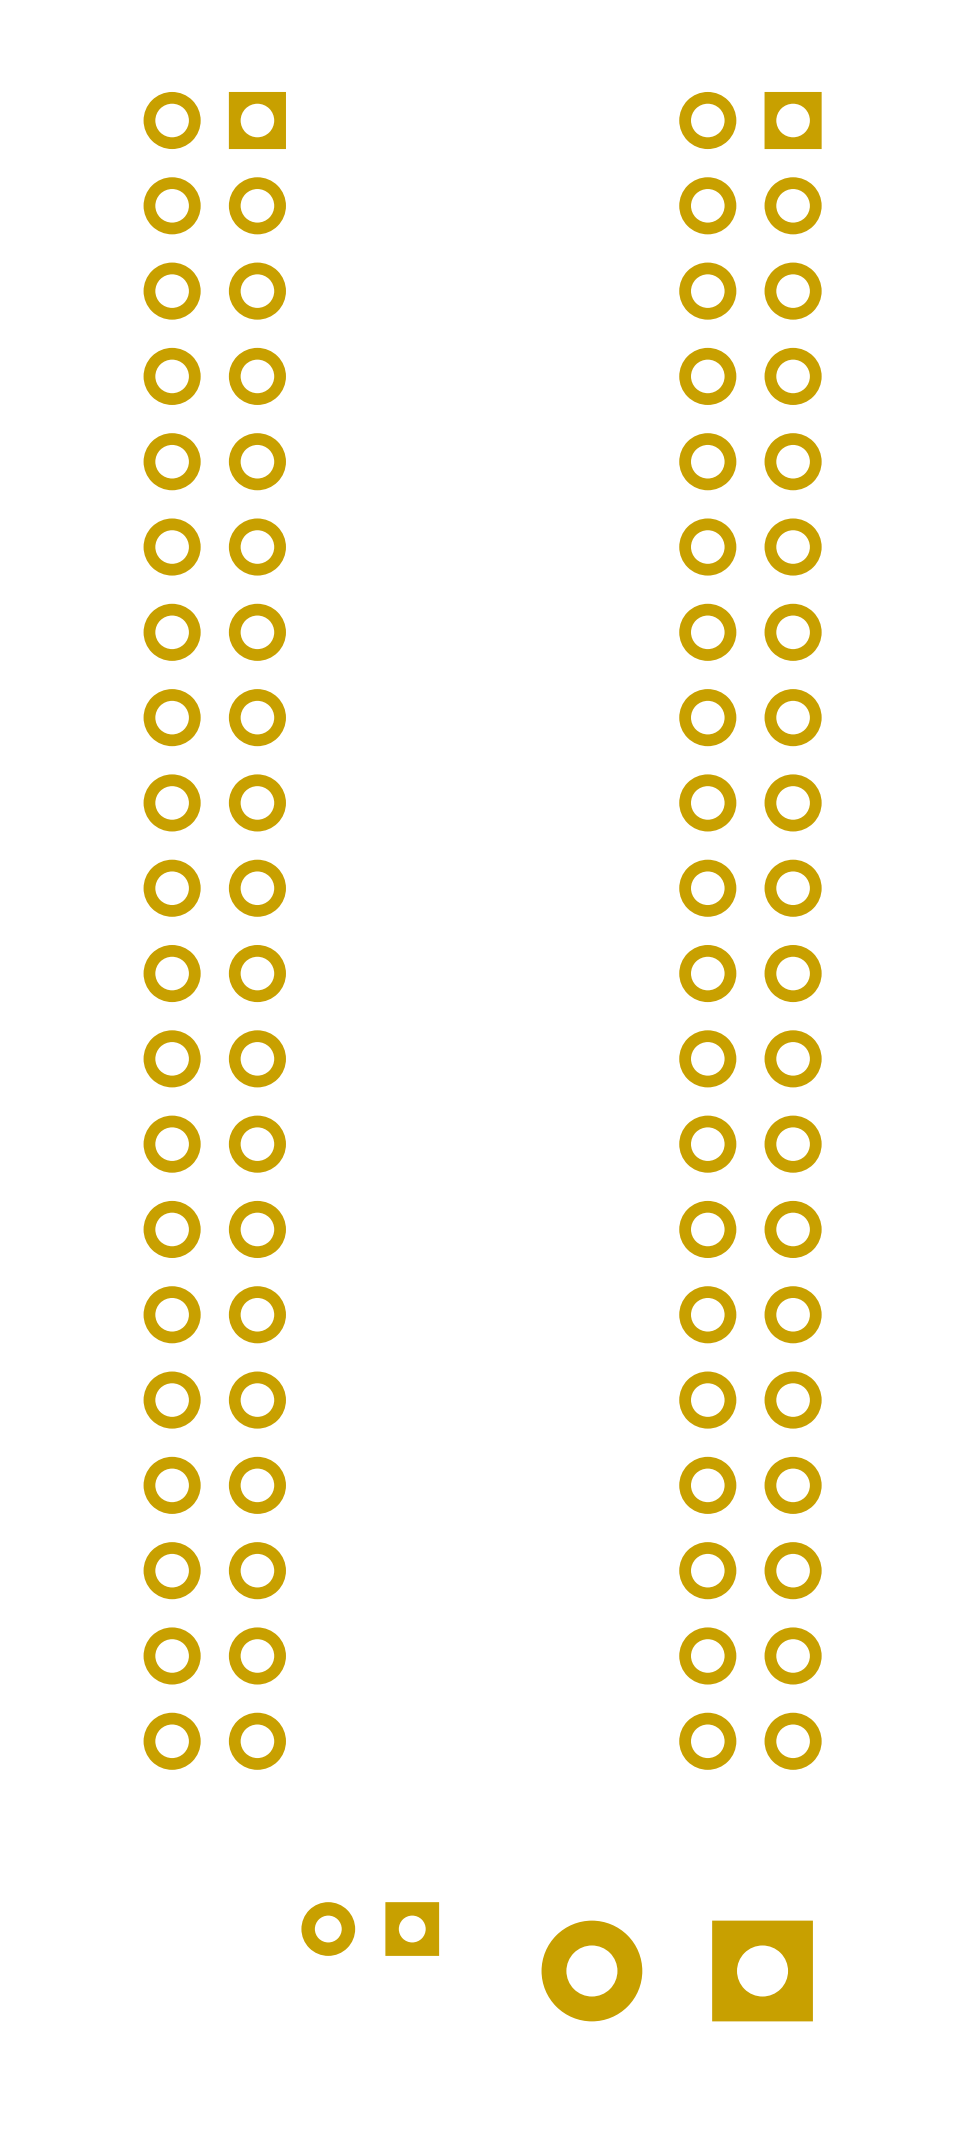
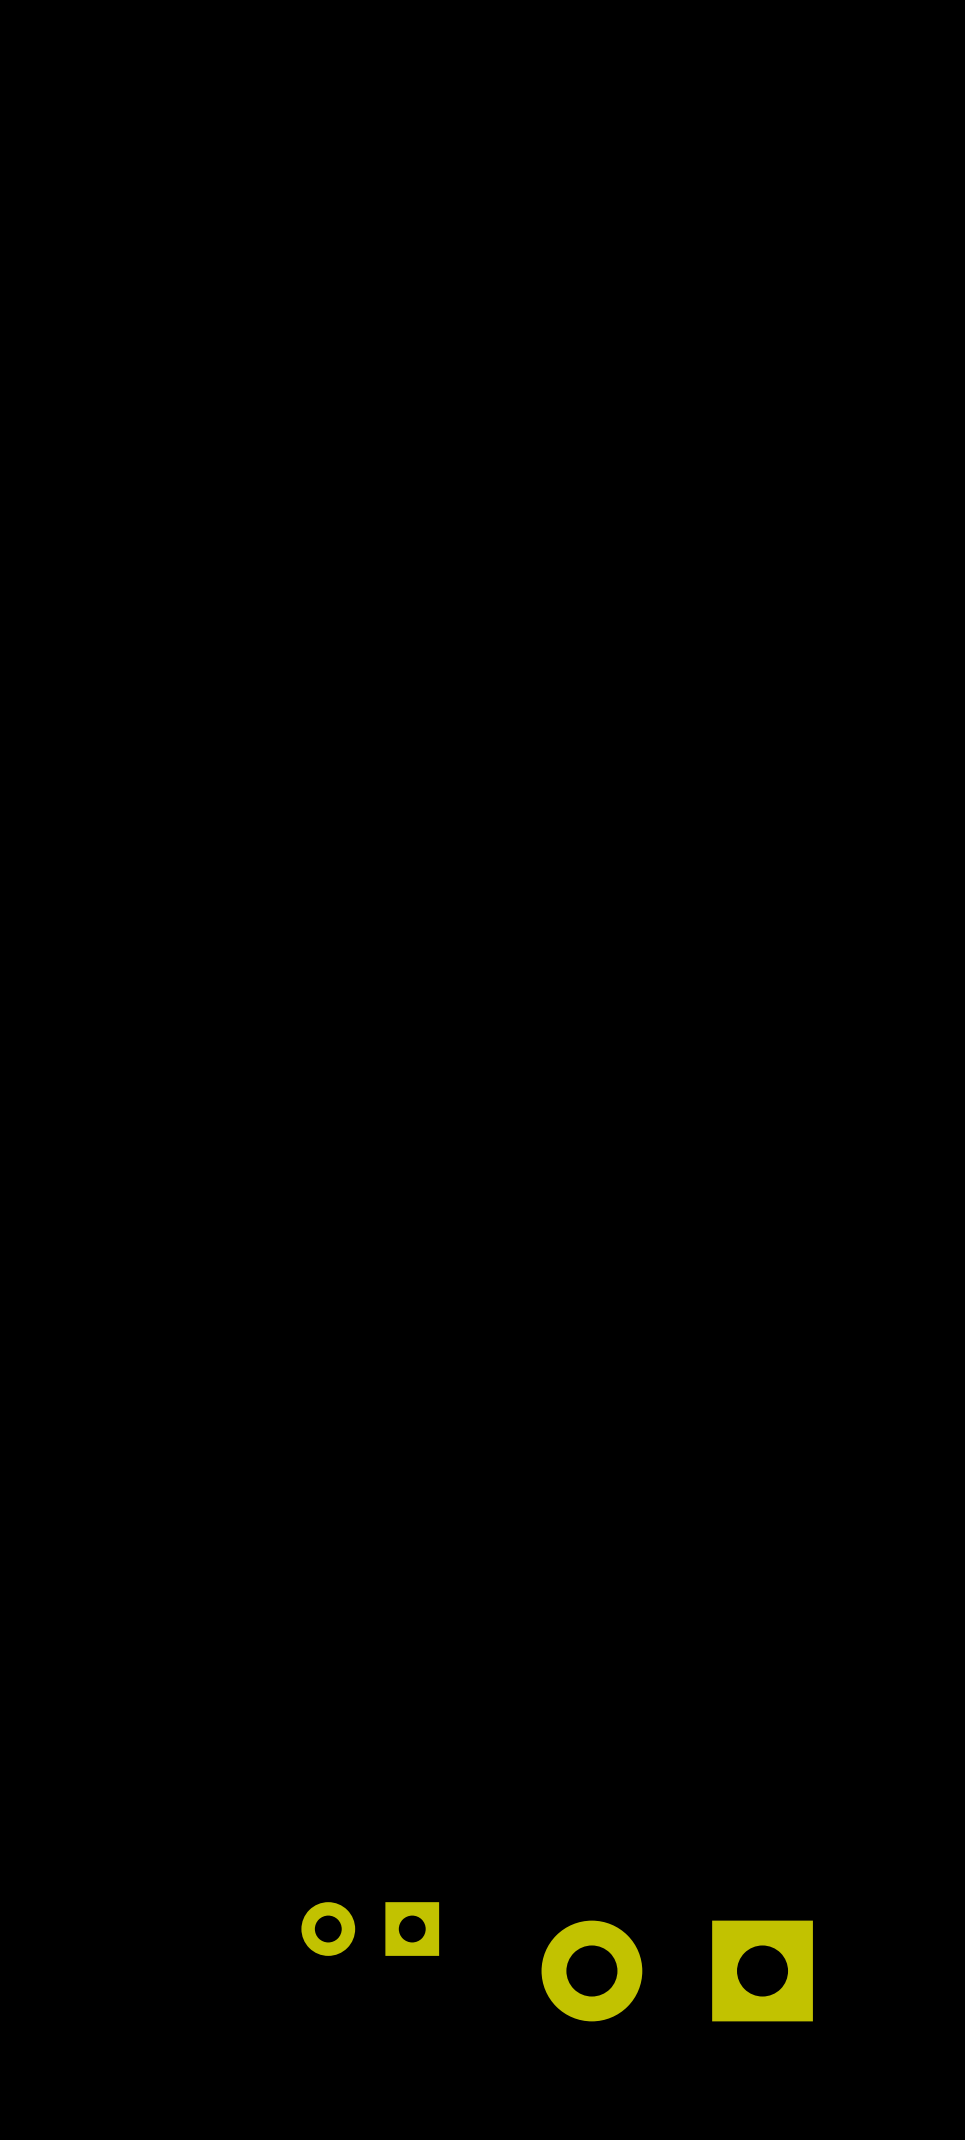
part: (214, 930) -> none
part: (750, 930) -> none

